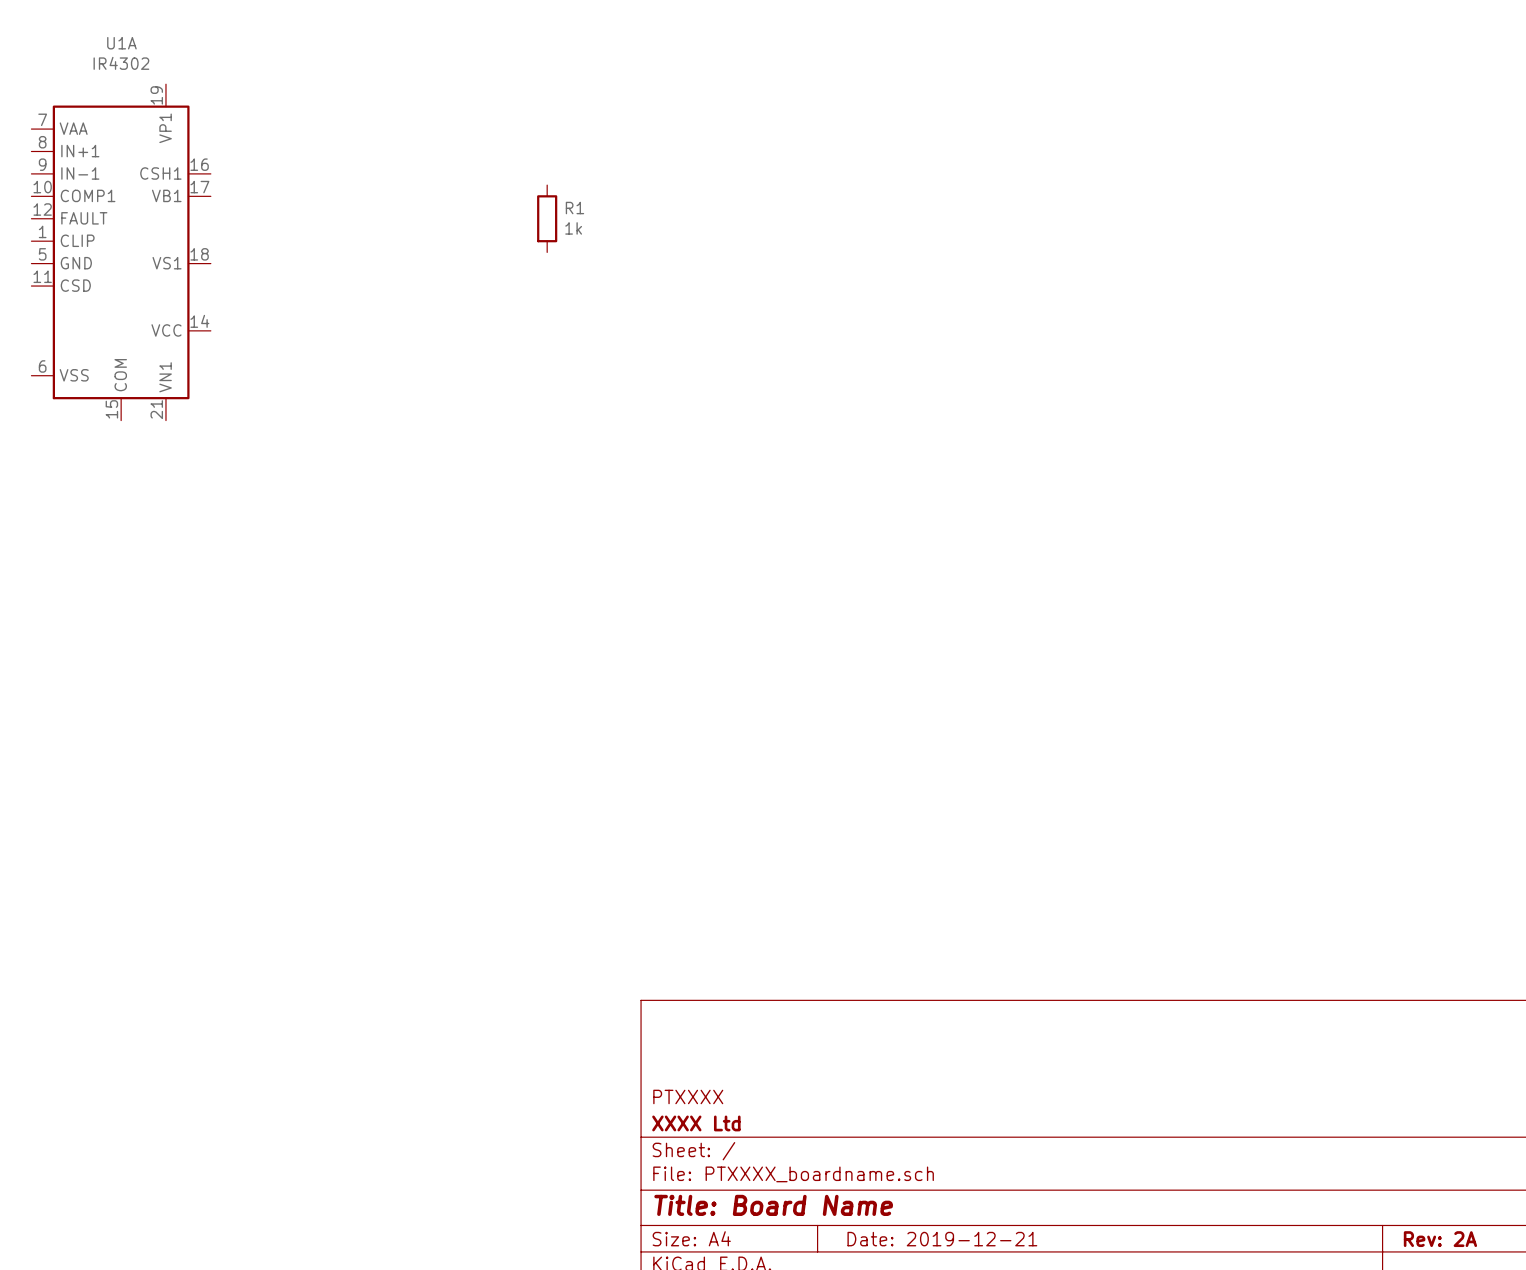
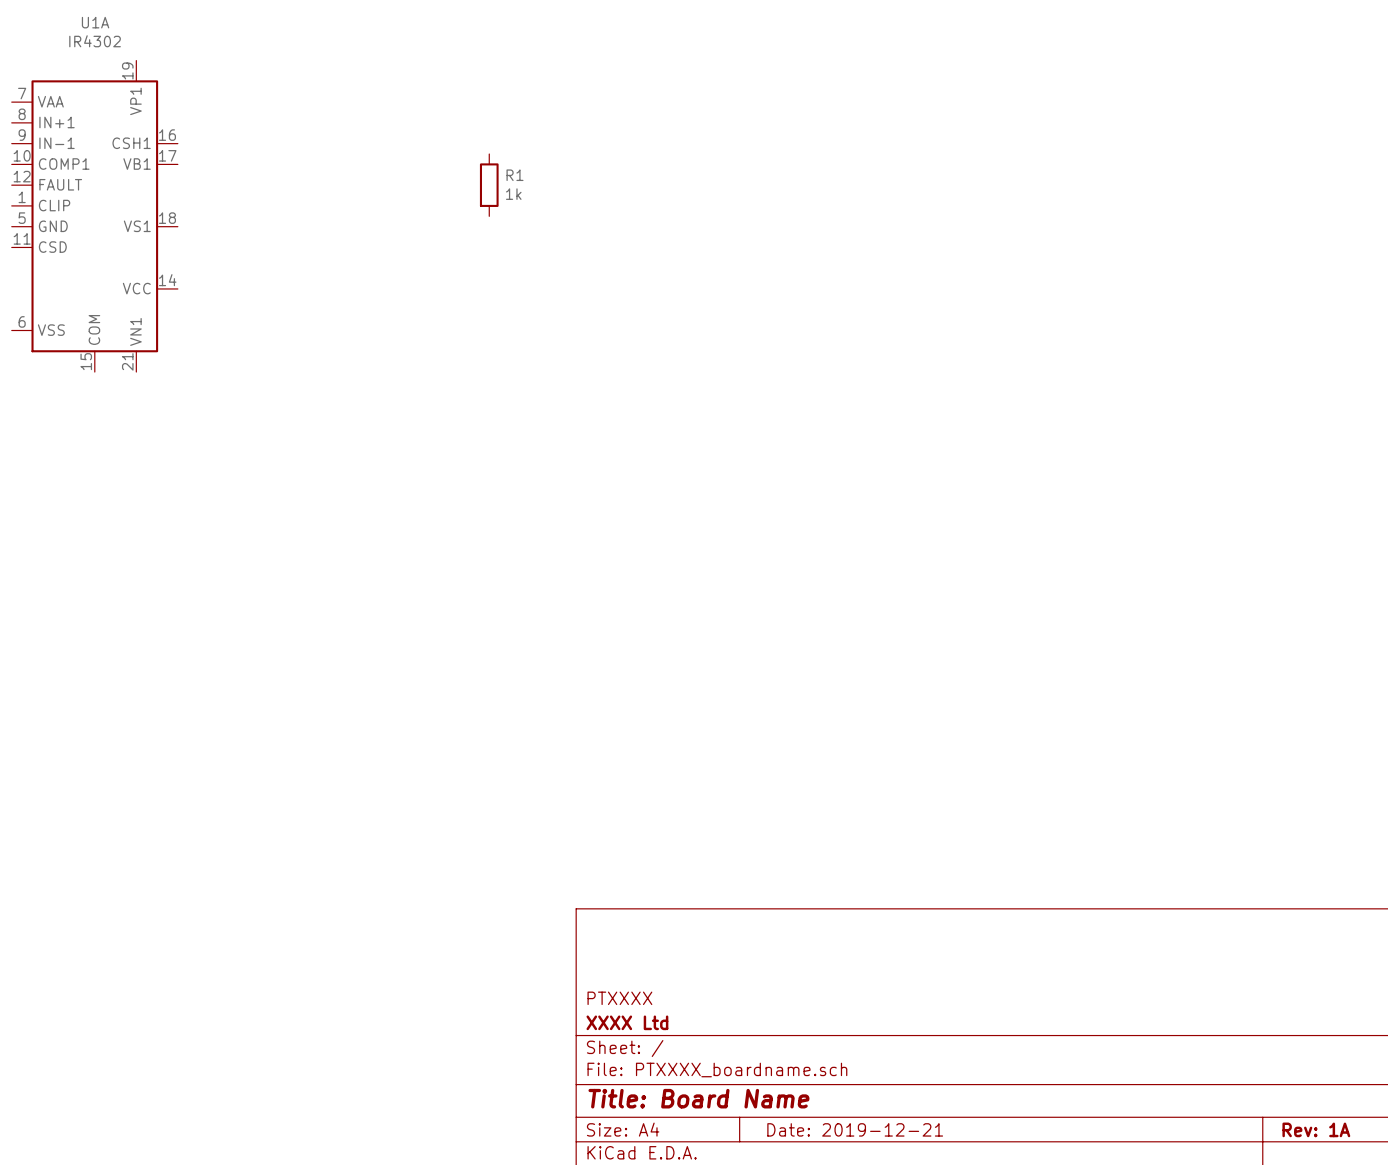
title block: Rev: 2A (1440, 1239) -> Rev: 1A (1316, 1129)

